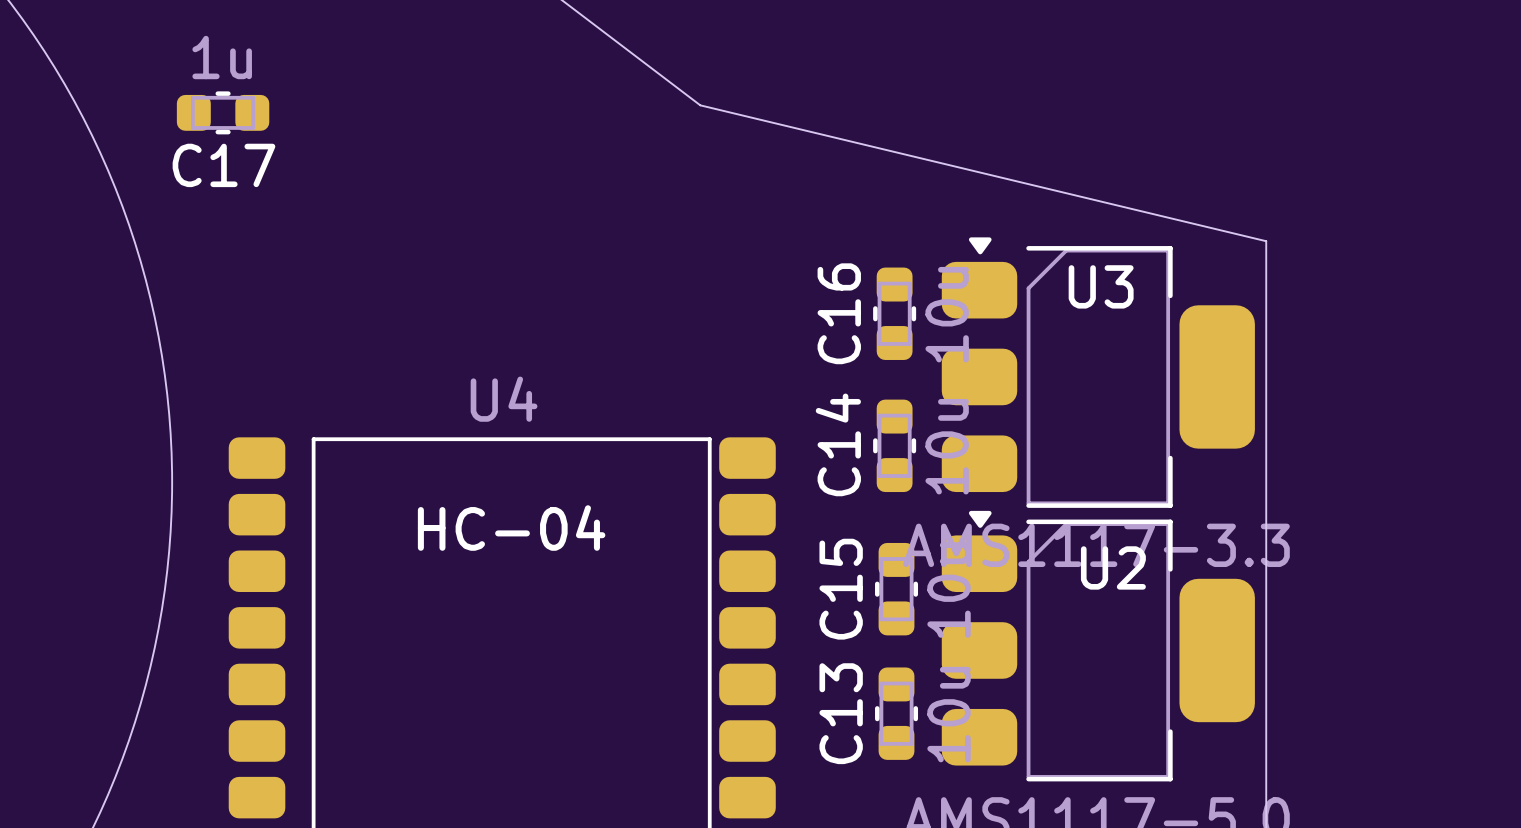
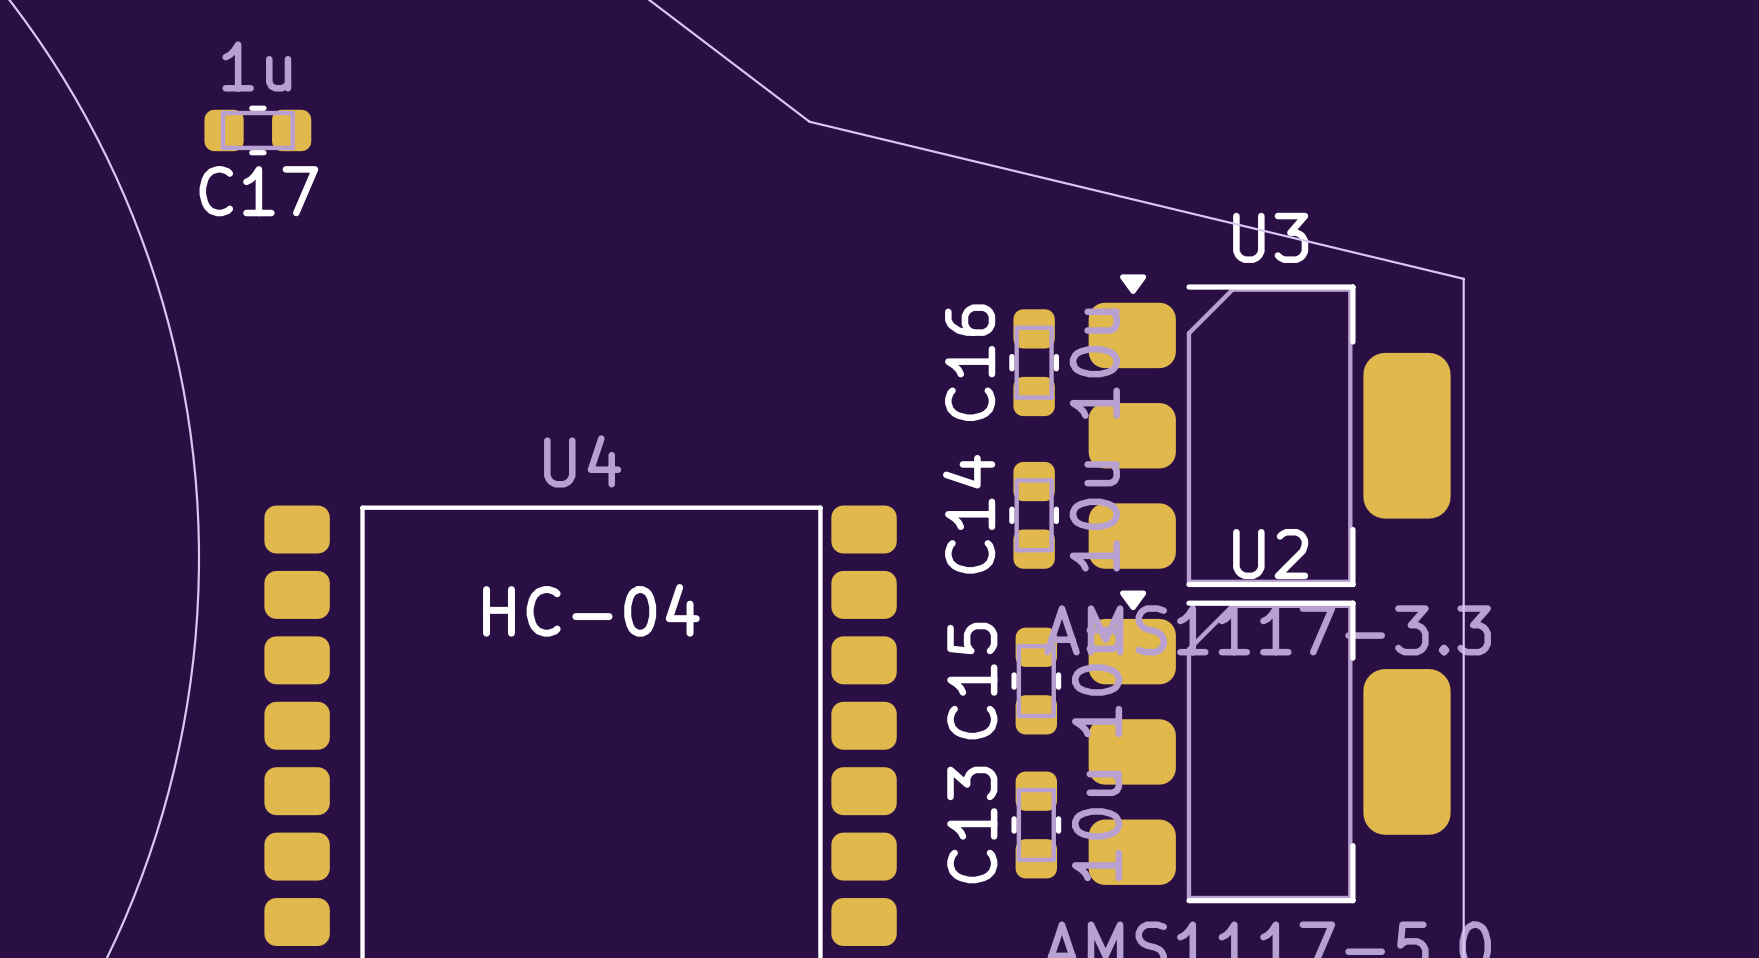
U3 name position: U3 (1101, 286) -> U3 (1270, 237)
U2 name position: U2 (1113, 567) -> U2 (1270, 554)

